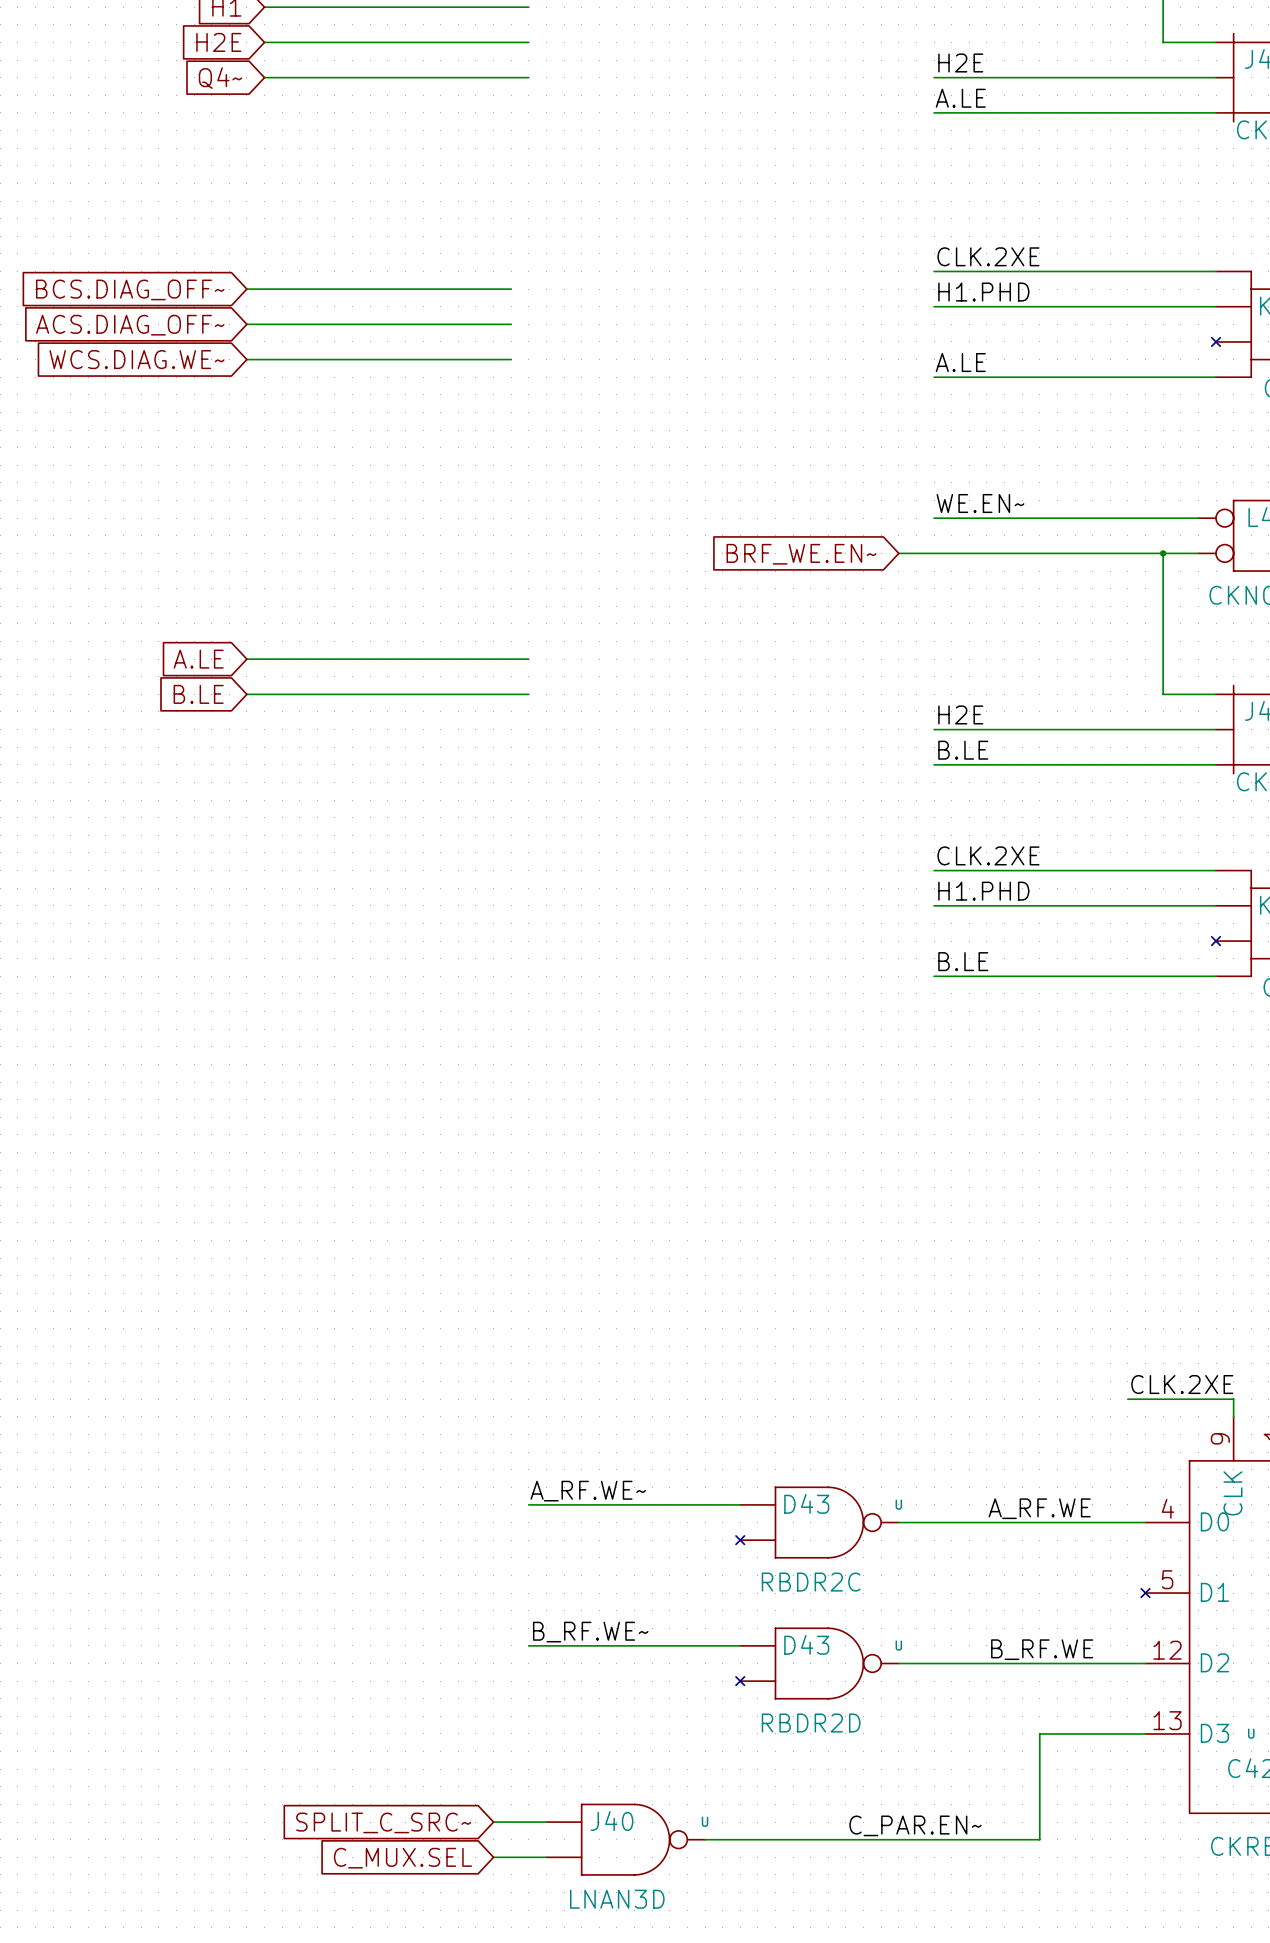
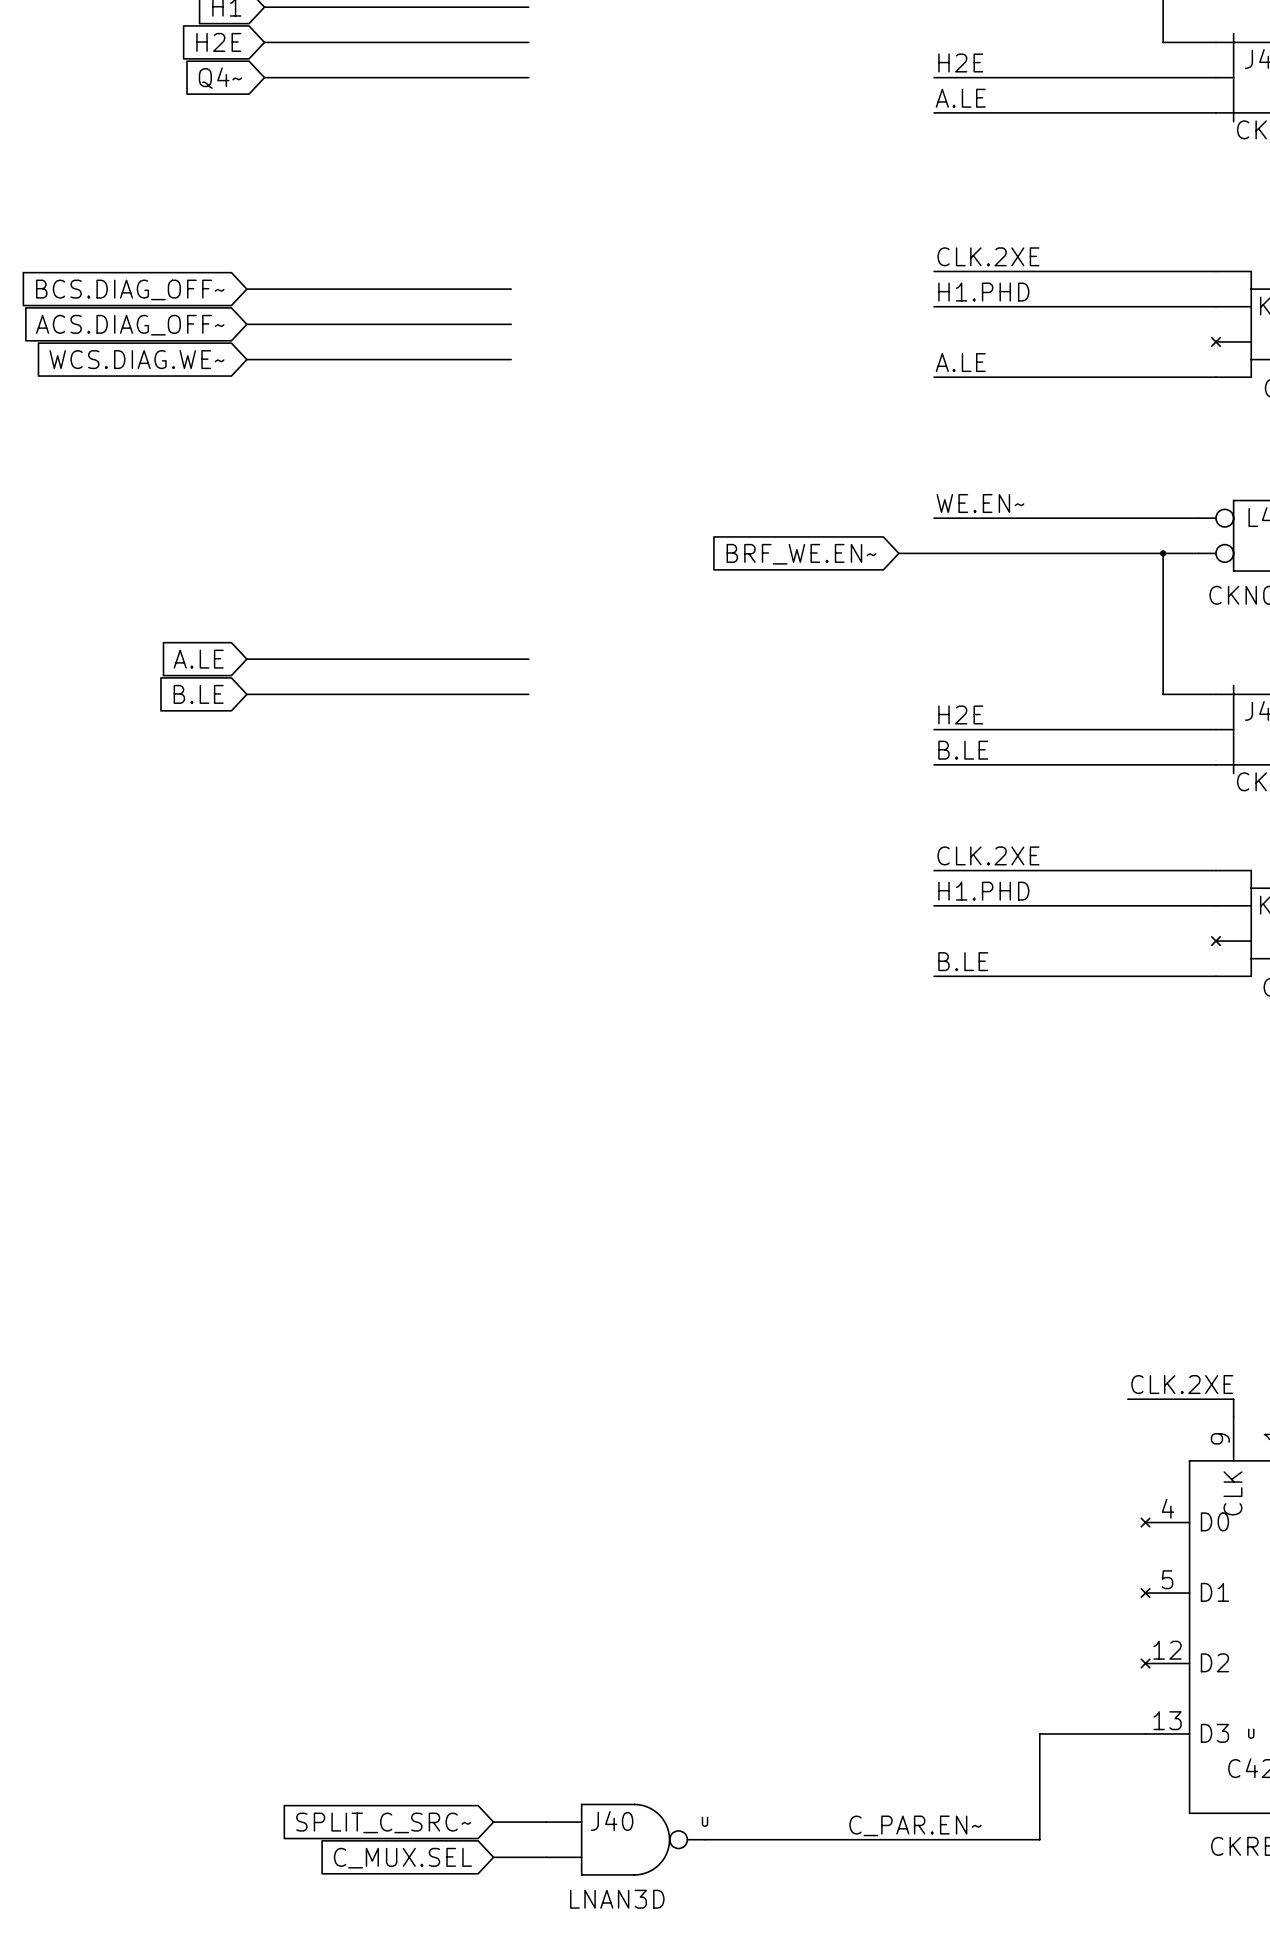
label: A_RF.WE~ (588, 1491) -> none
wire: (528, 1504) (740, 1504) -> none
label: A_RF.WE (1039, 1508) -> none
U: (819, 1522) -> none
wire: (898, 1522) (1145, 1522) -> none
no-connect mark: none -> (1145, 1522)
no-connect mark: (740, 1540) -> none
label: B_RF.WE~ (590, 1632) -> none
wire: (528, 1645) (740, 1645) -> none
label: B_RF.WE (1042, 1649) -> none
U: (819, 1663) -> none
wire: (898, 1663) (1145, 1663) -> none
no-connect mark: none -> (1145, 1663)
no-connect mark: (740, 1681) -> none

